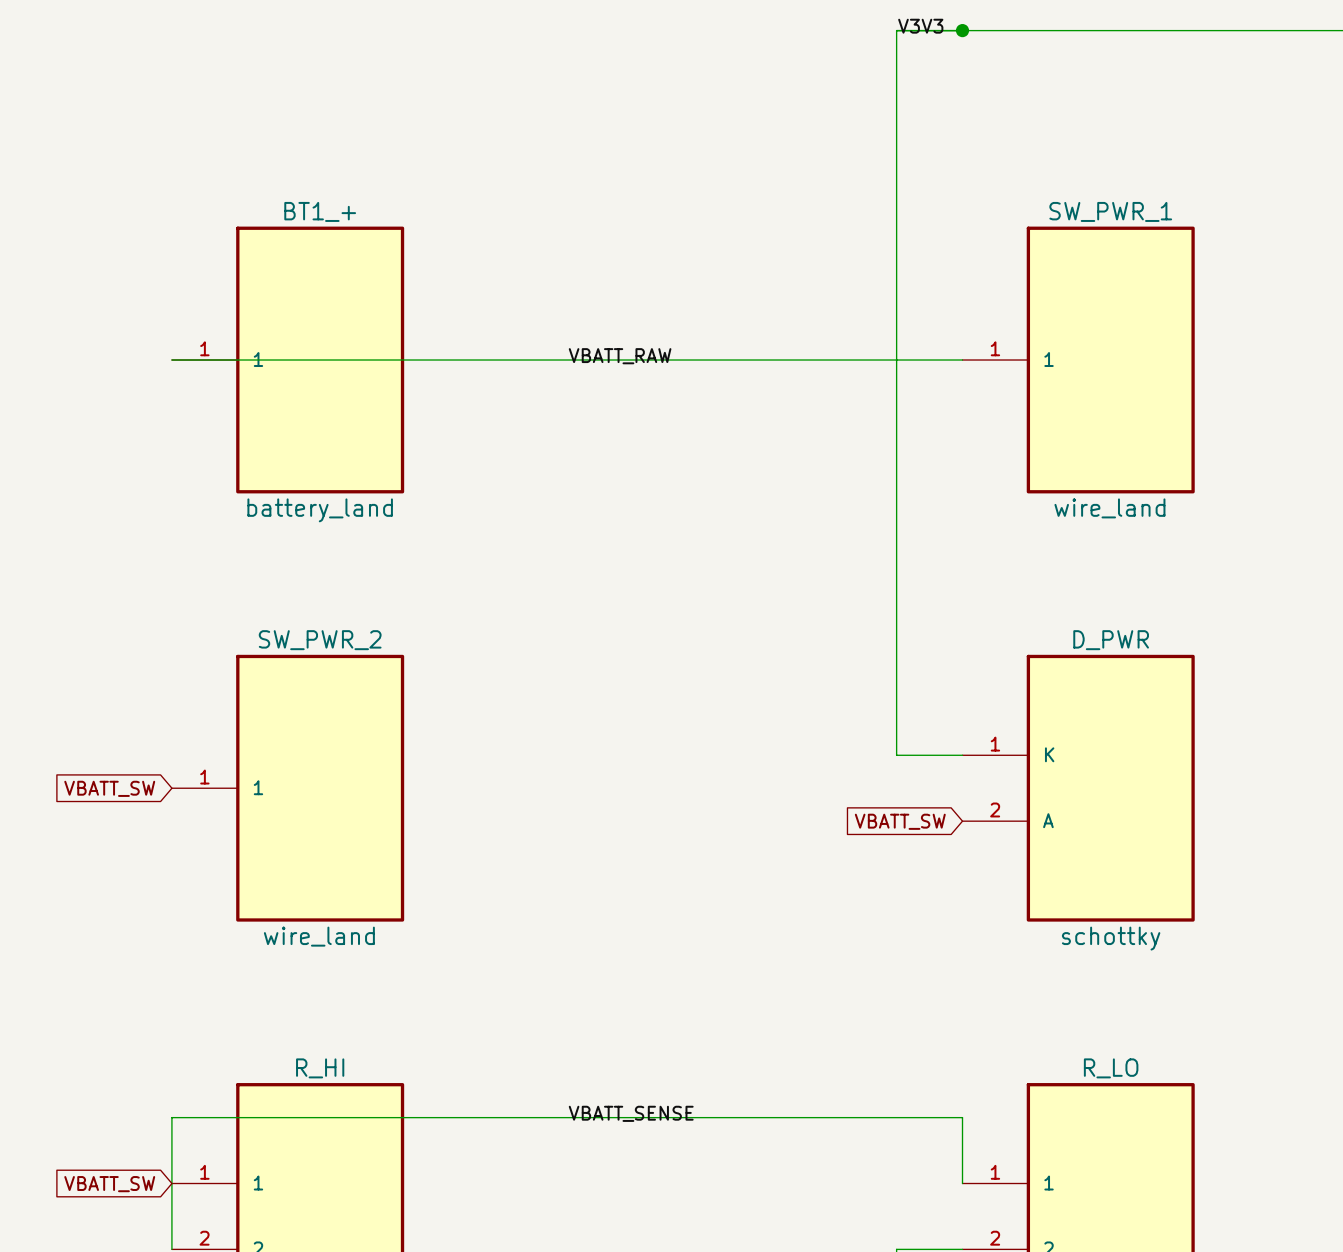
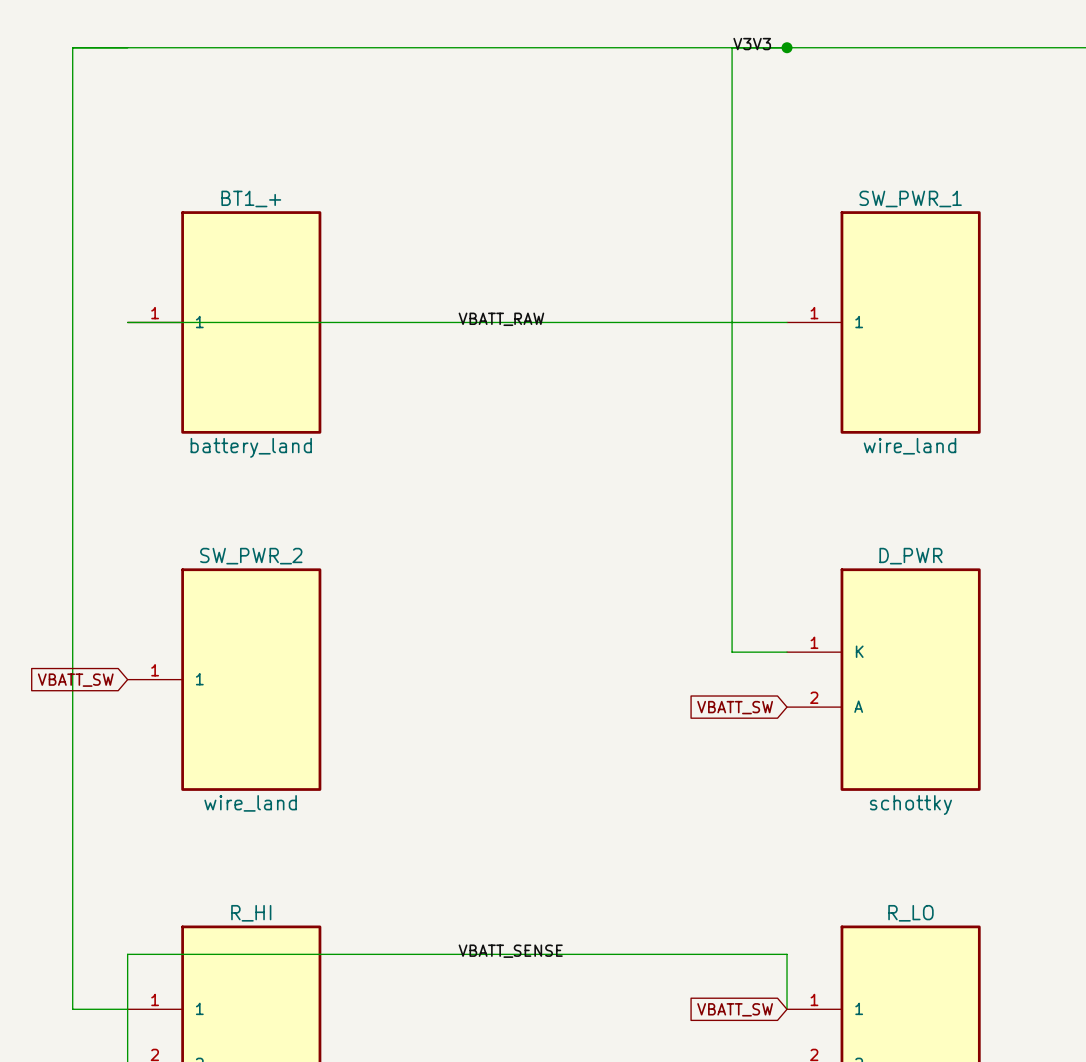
wire: none -> (732, 47) (72, 47) (72, 1009) (127, 1009)
global label: VBATT_SW (109, 1184) -> none
global label: none -> VBATT_SW (735, 1009)

